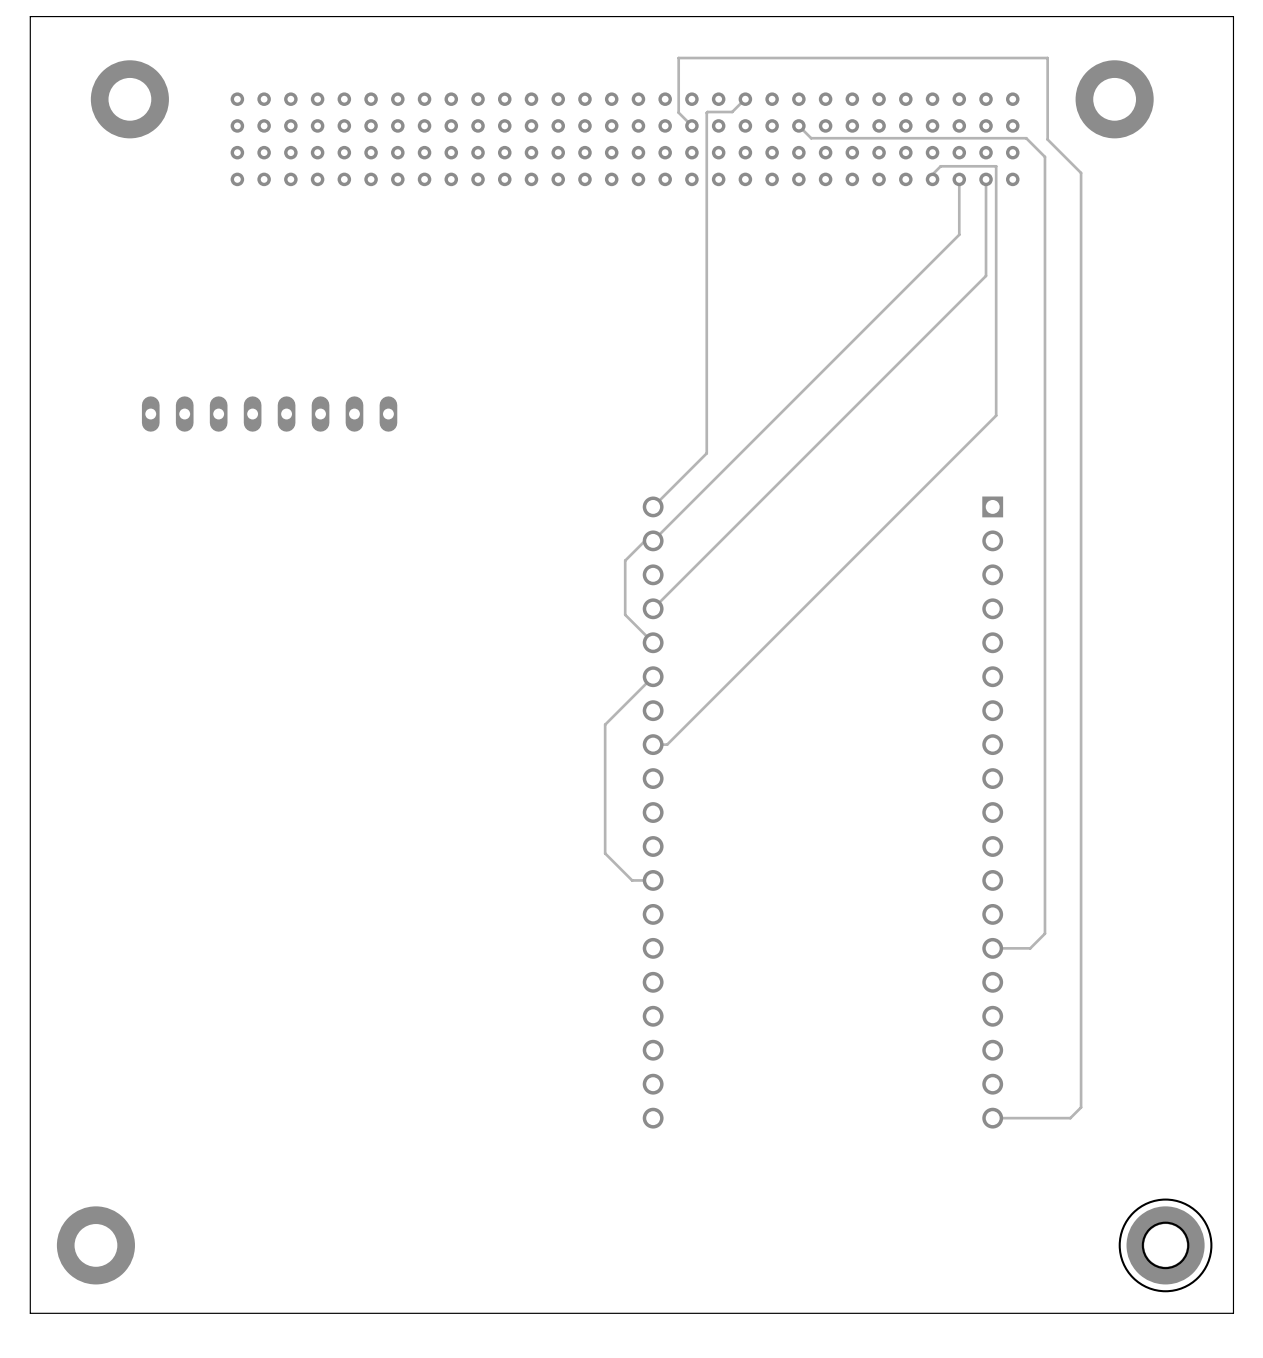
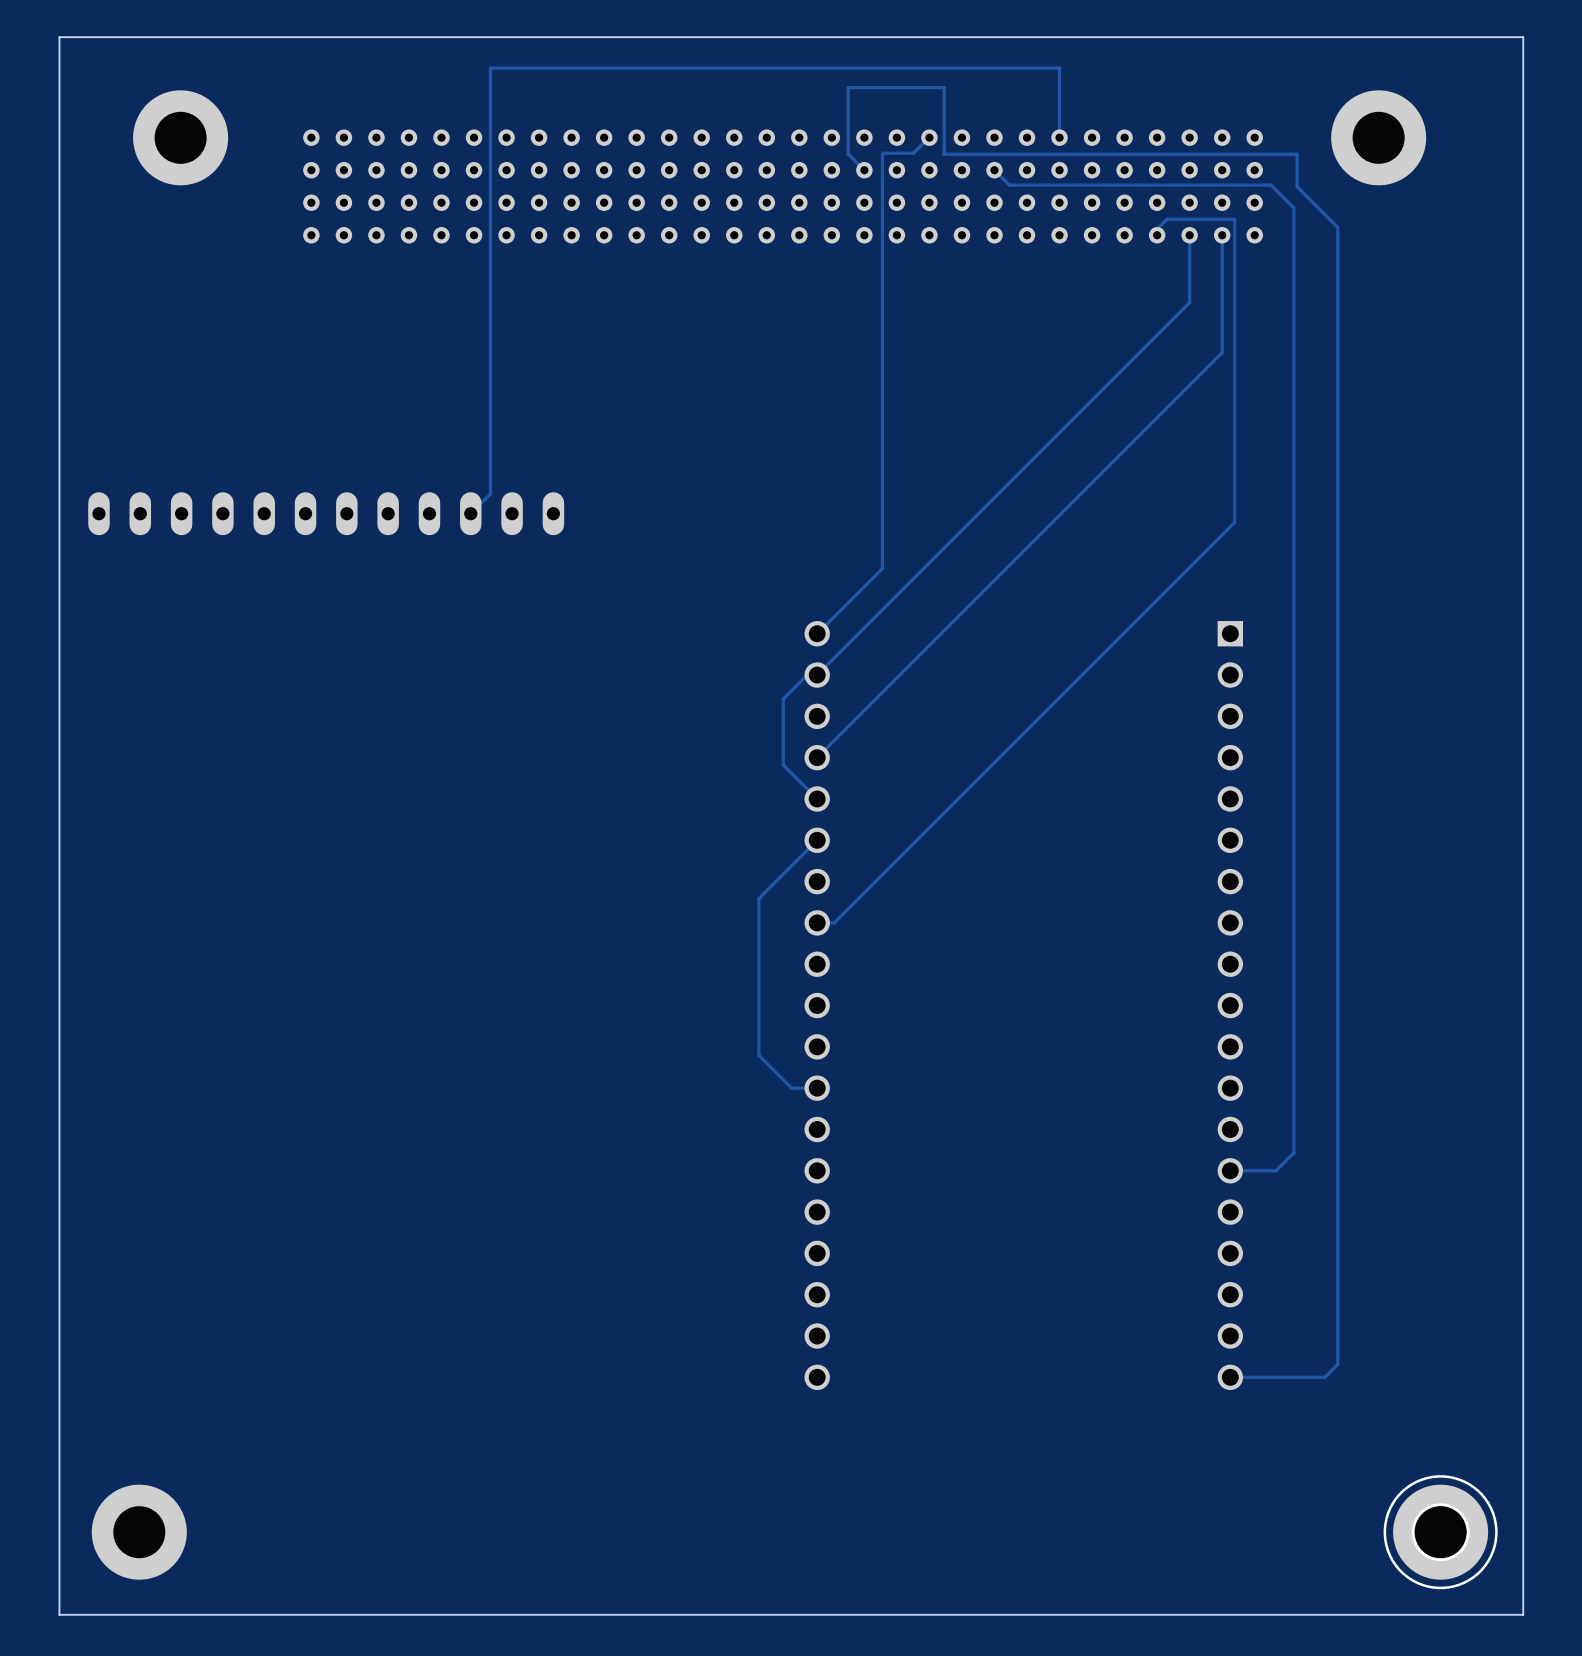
track: (757, 58) (1047, 58) (1047, 112) -> (944, 87) (944, 154) (1297, 154)
track: none -> (1059, 137) (1059, 68) (490, 68) (490, 494) (470, 513)
part: none -> (326, 513)
part: (269, 414) -> none

